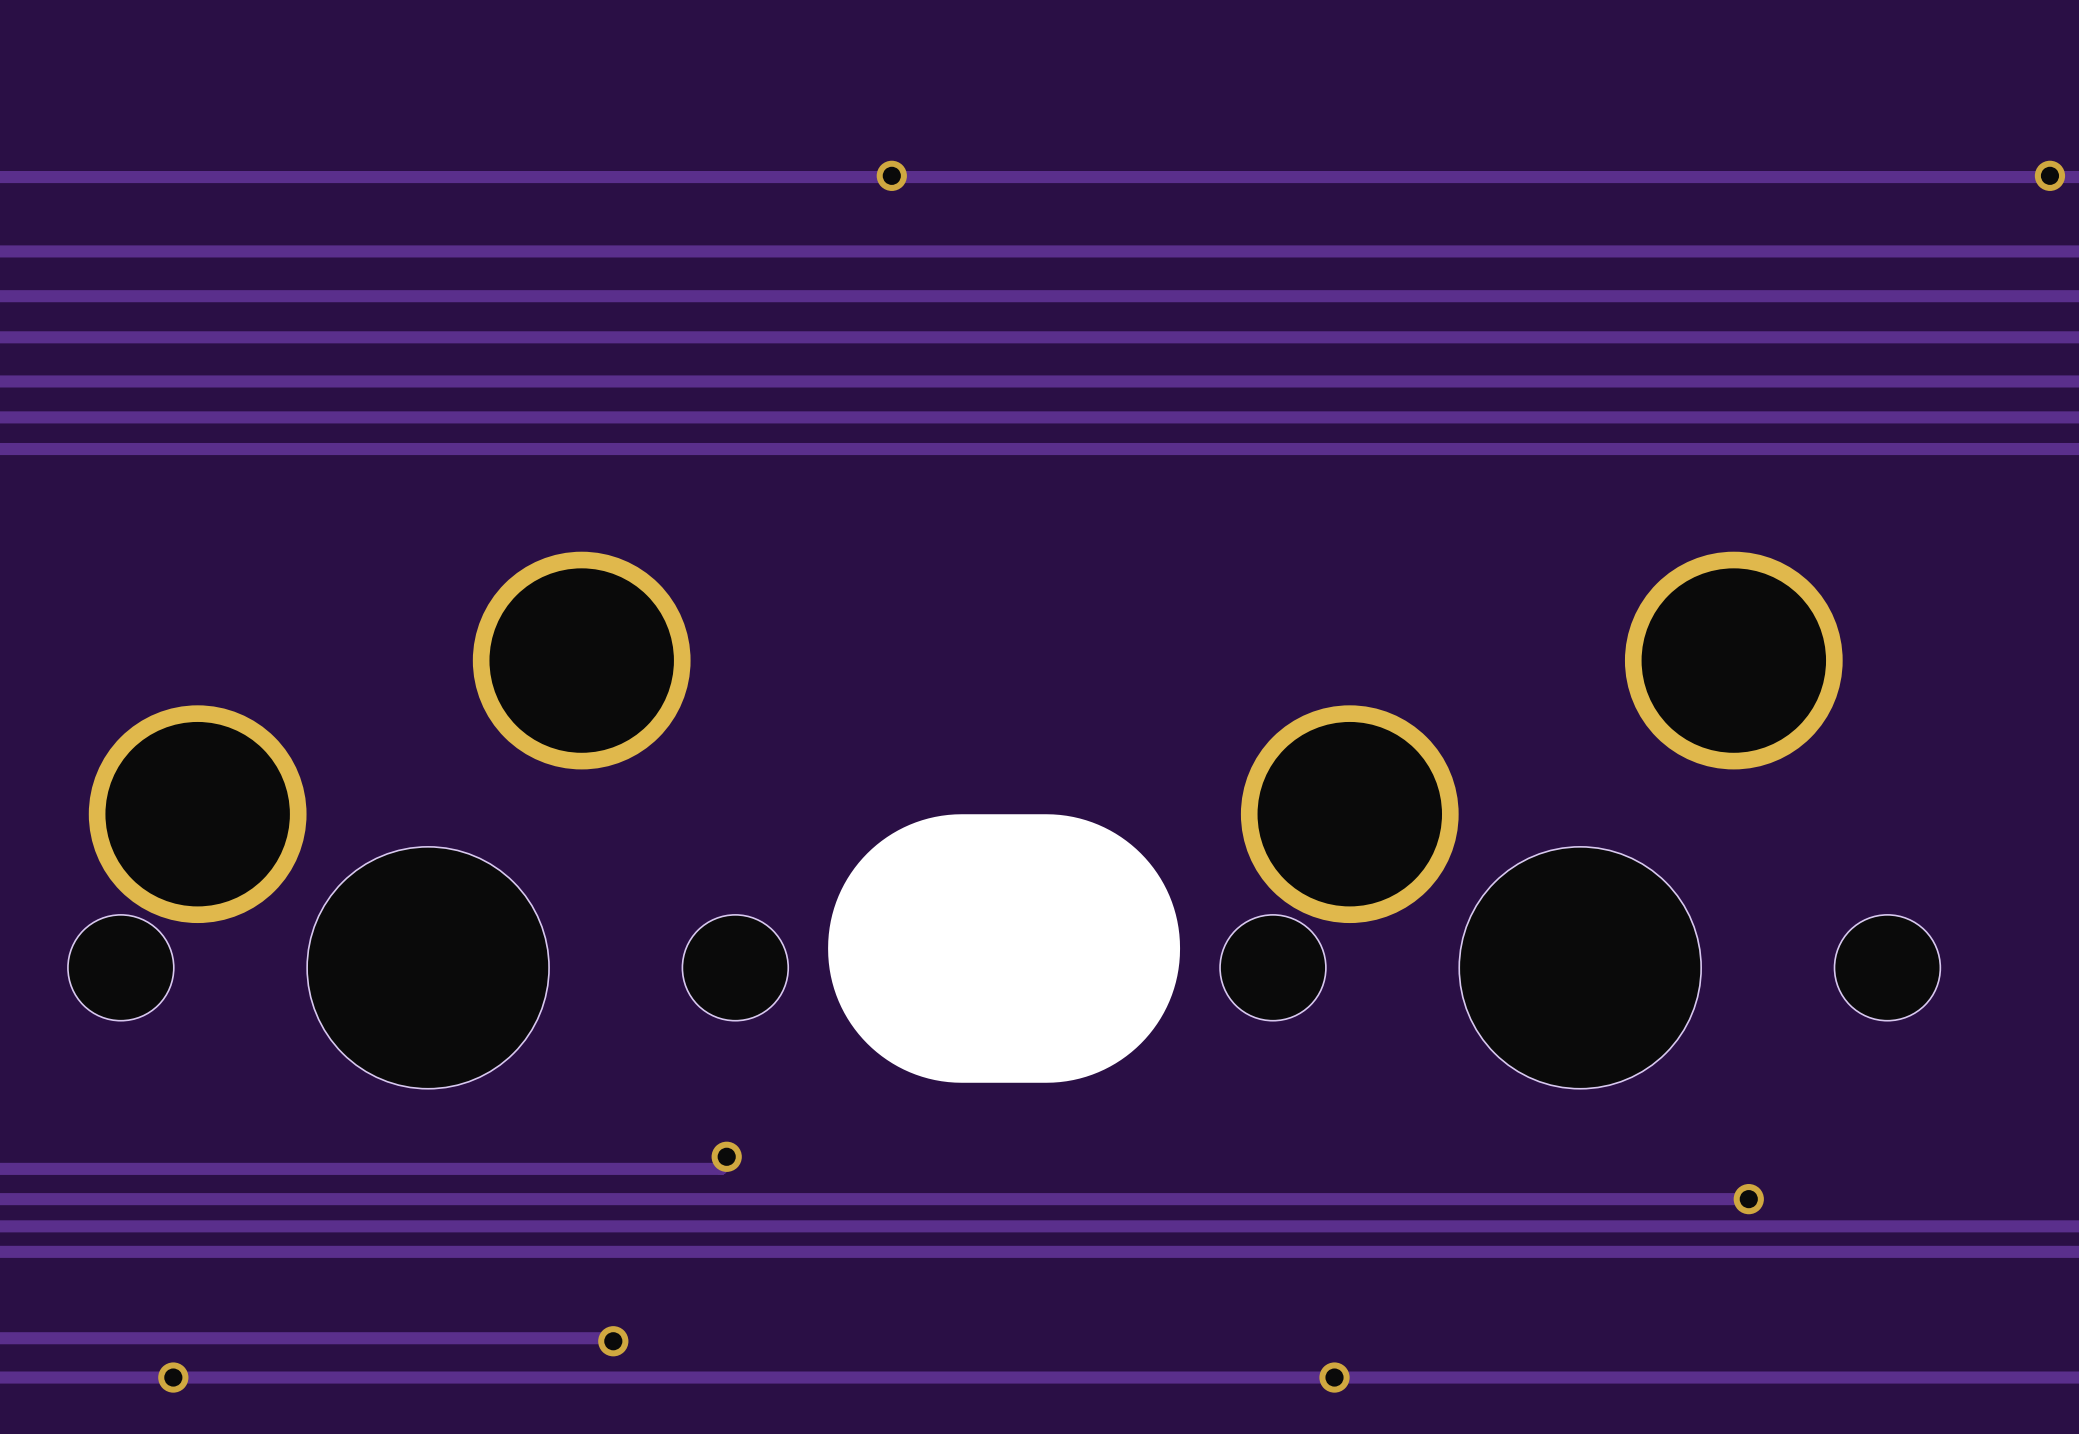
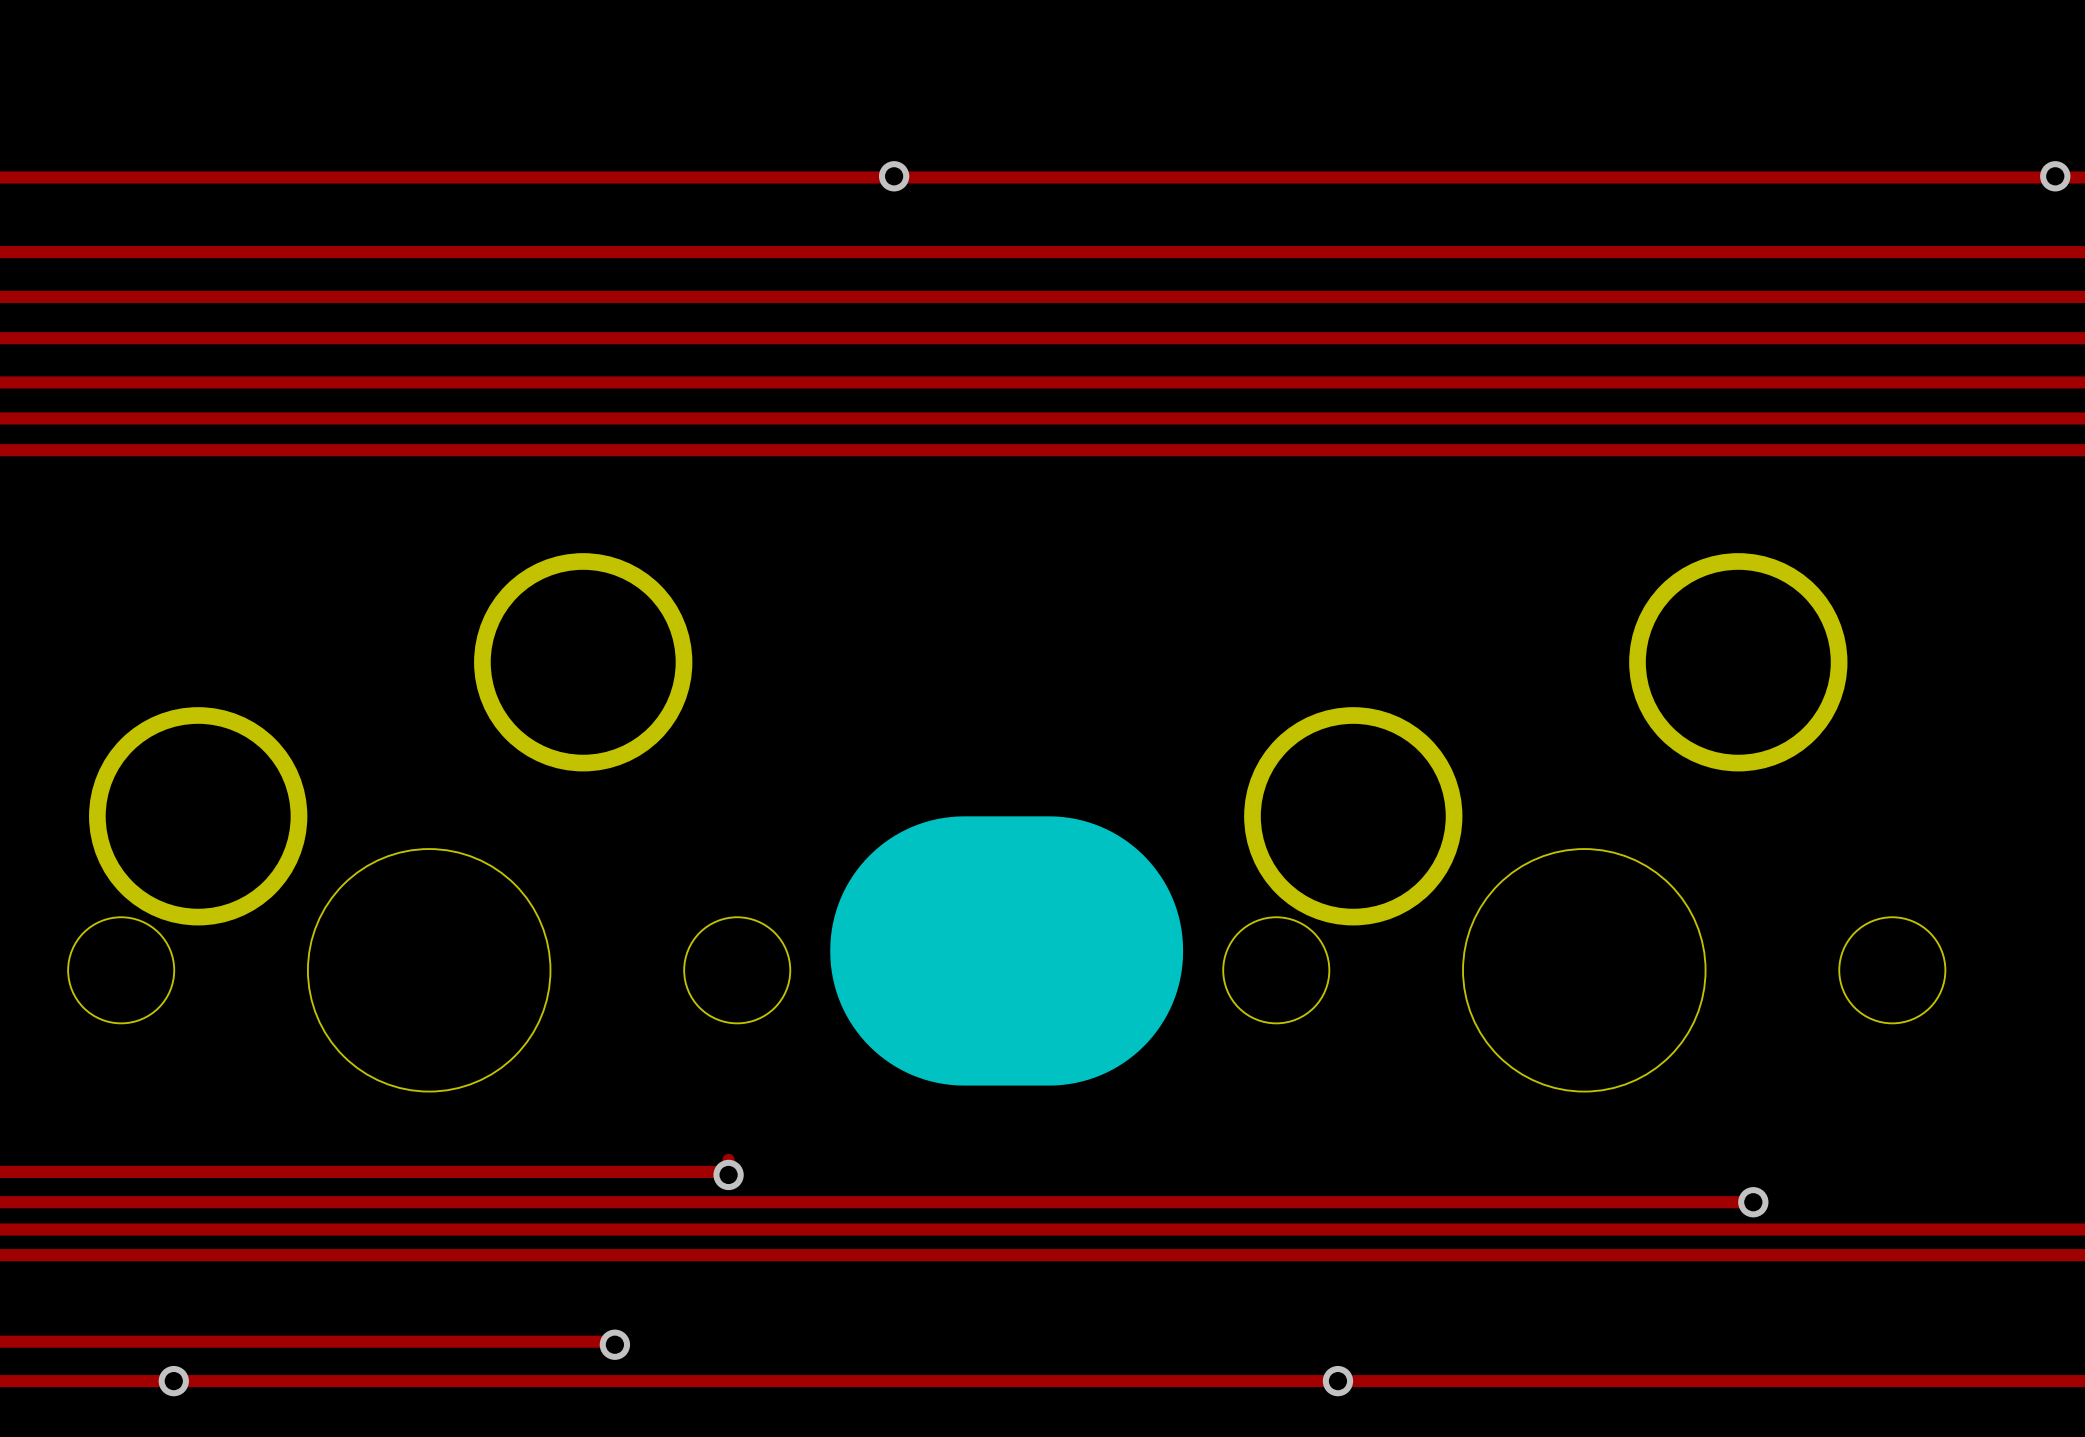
via position: (726, 1156) -> (728, 1174)

